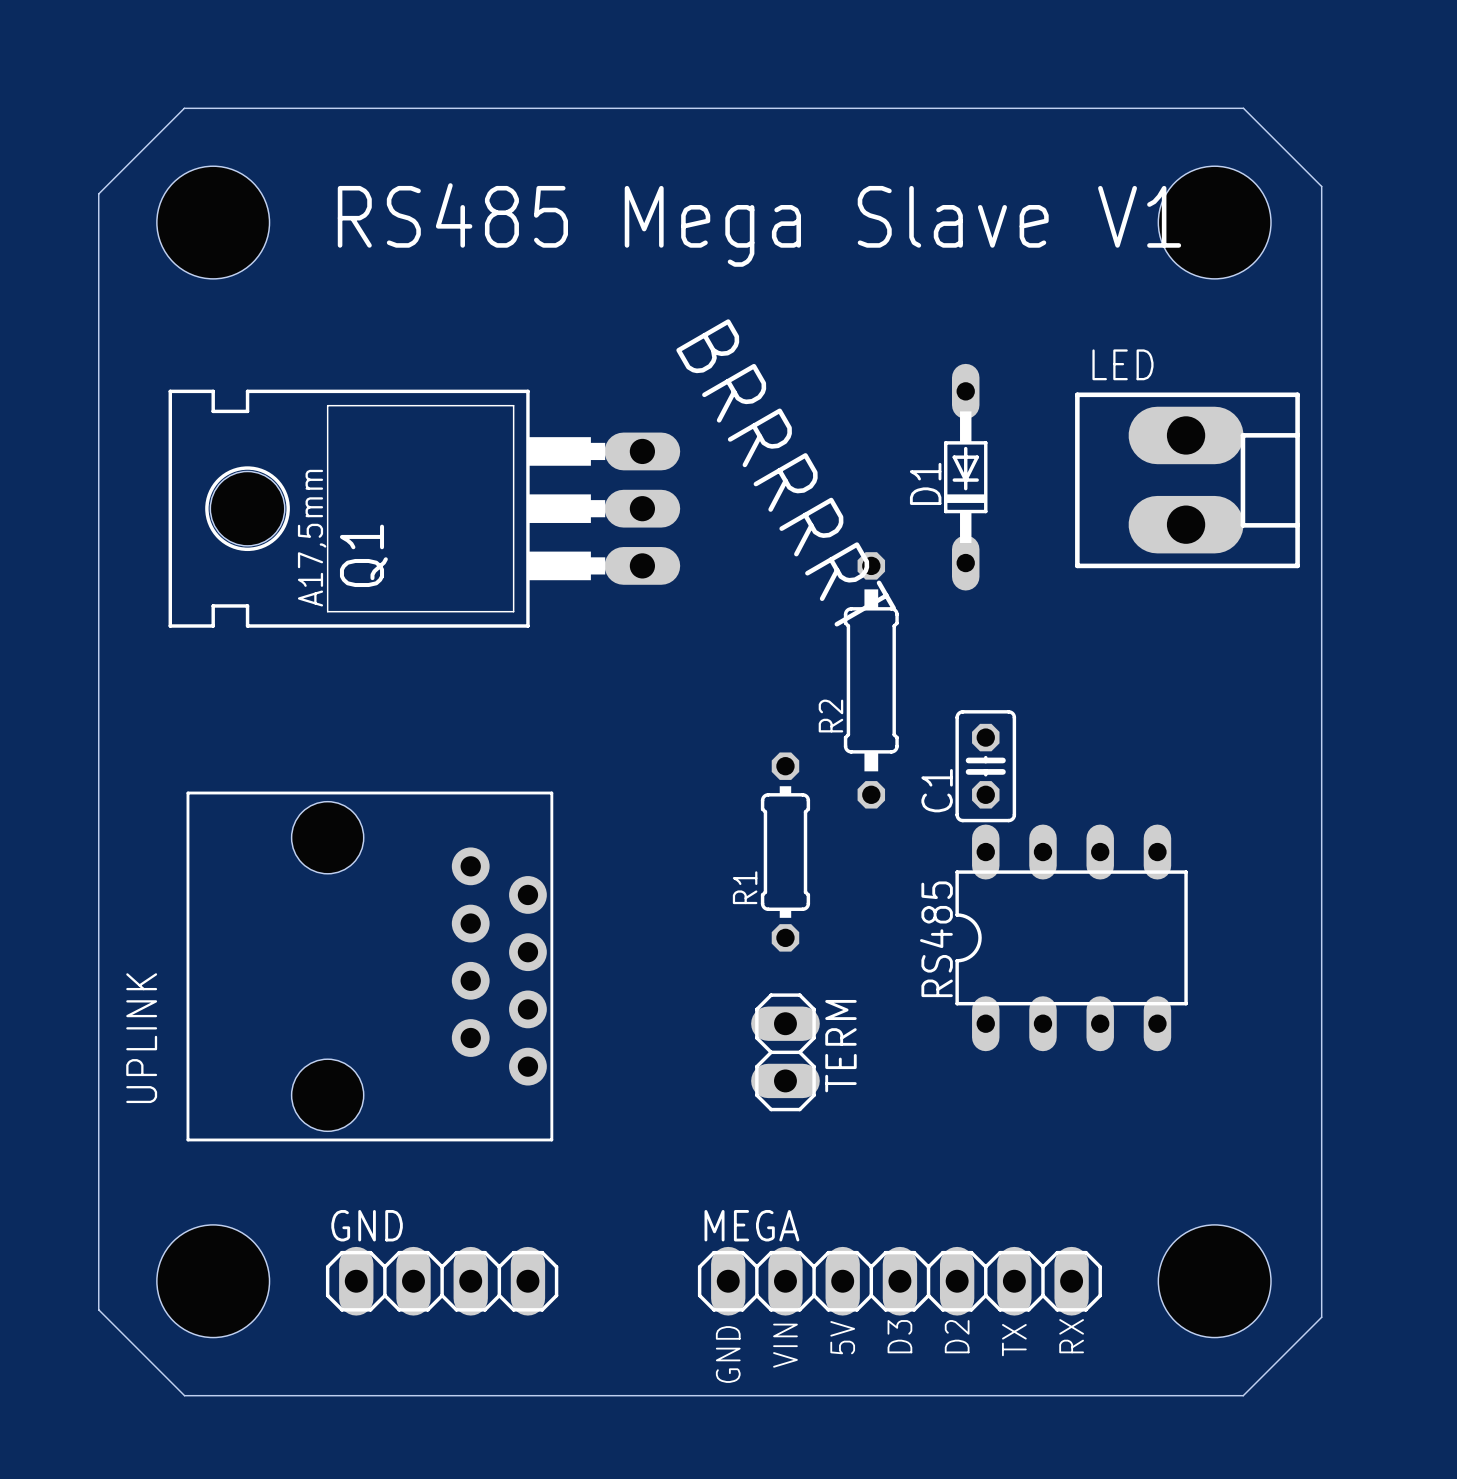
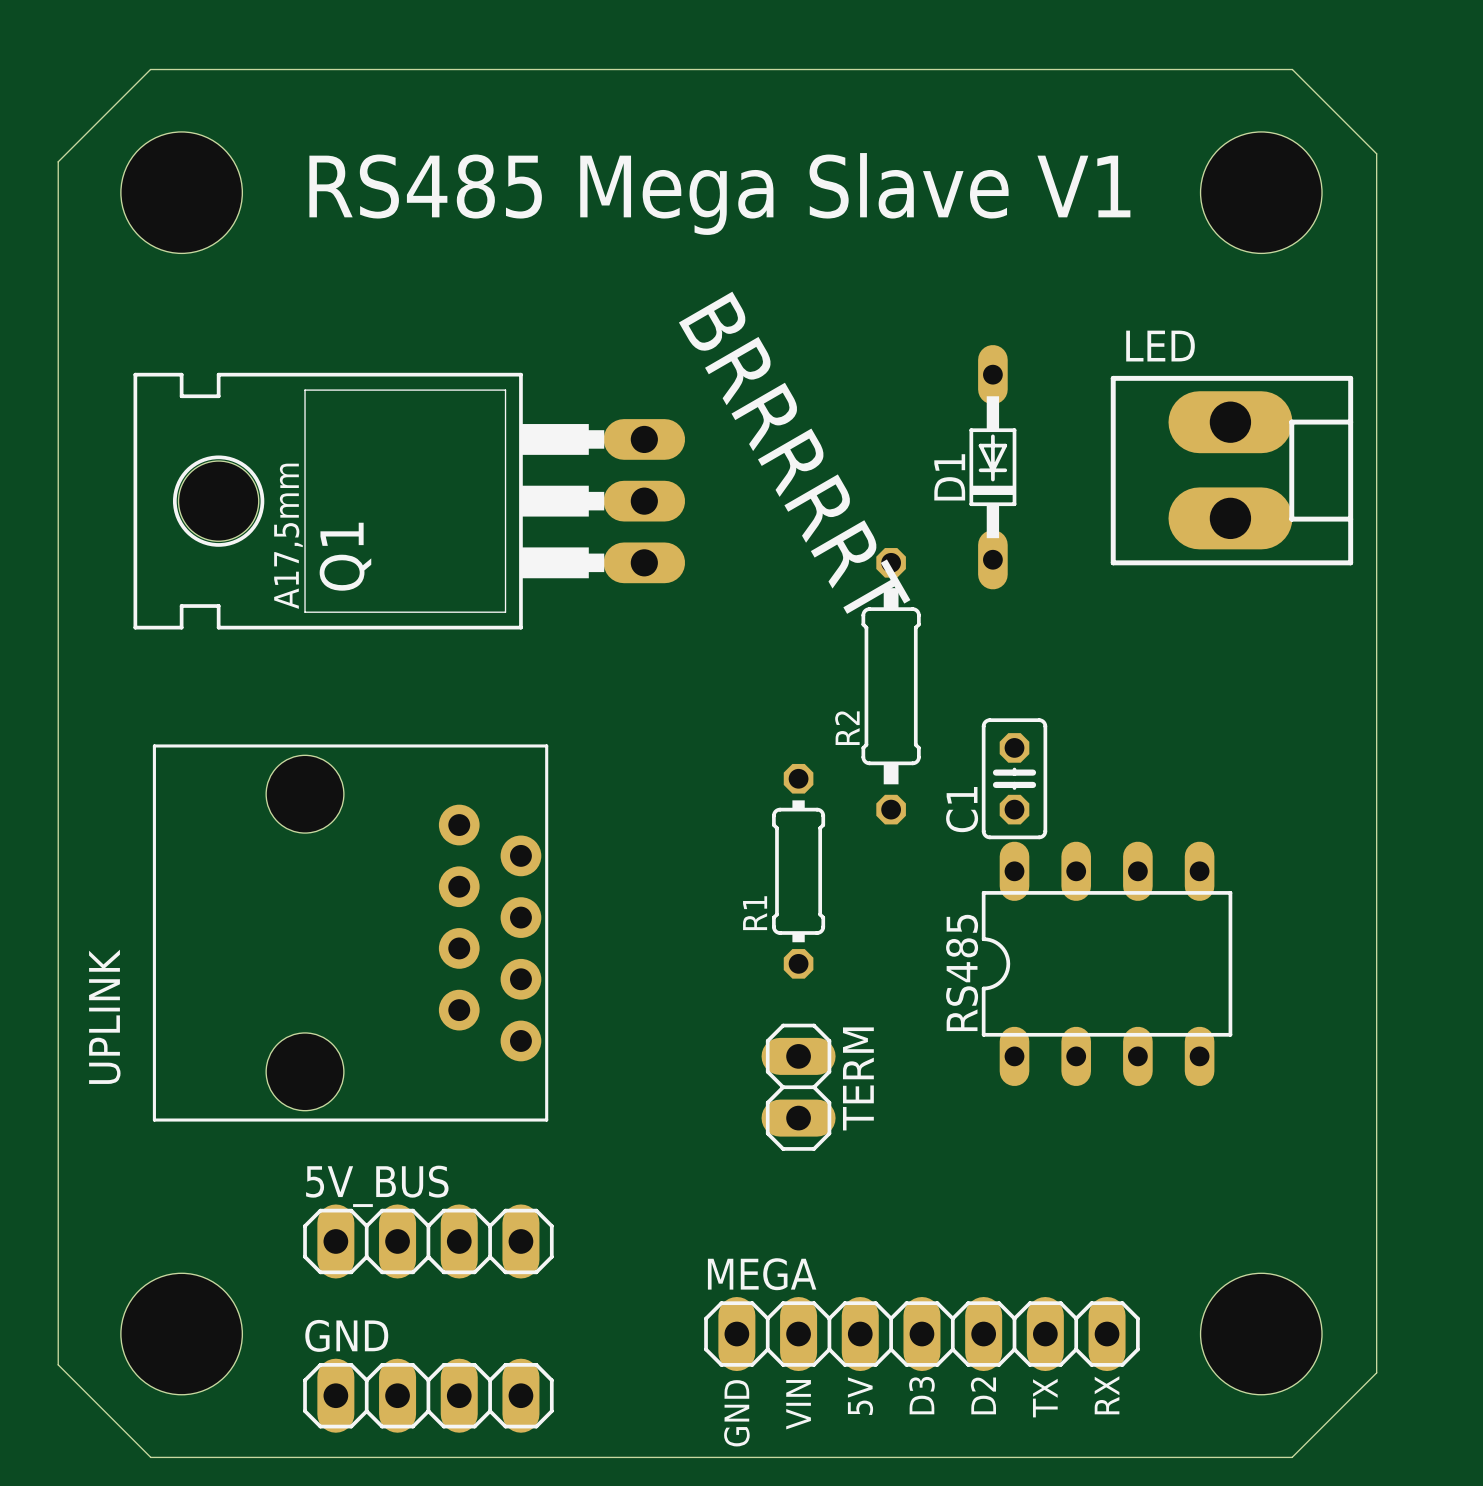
UPLINK position: (369, 966) -> (350, 933)
5V_BUS: none -> (428, 1241)
GND position: (442, 1281) -> (428, 1395)

